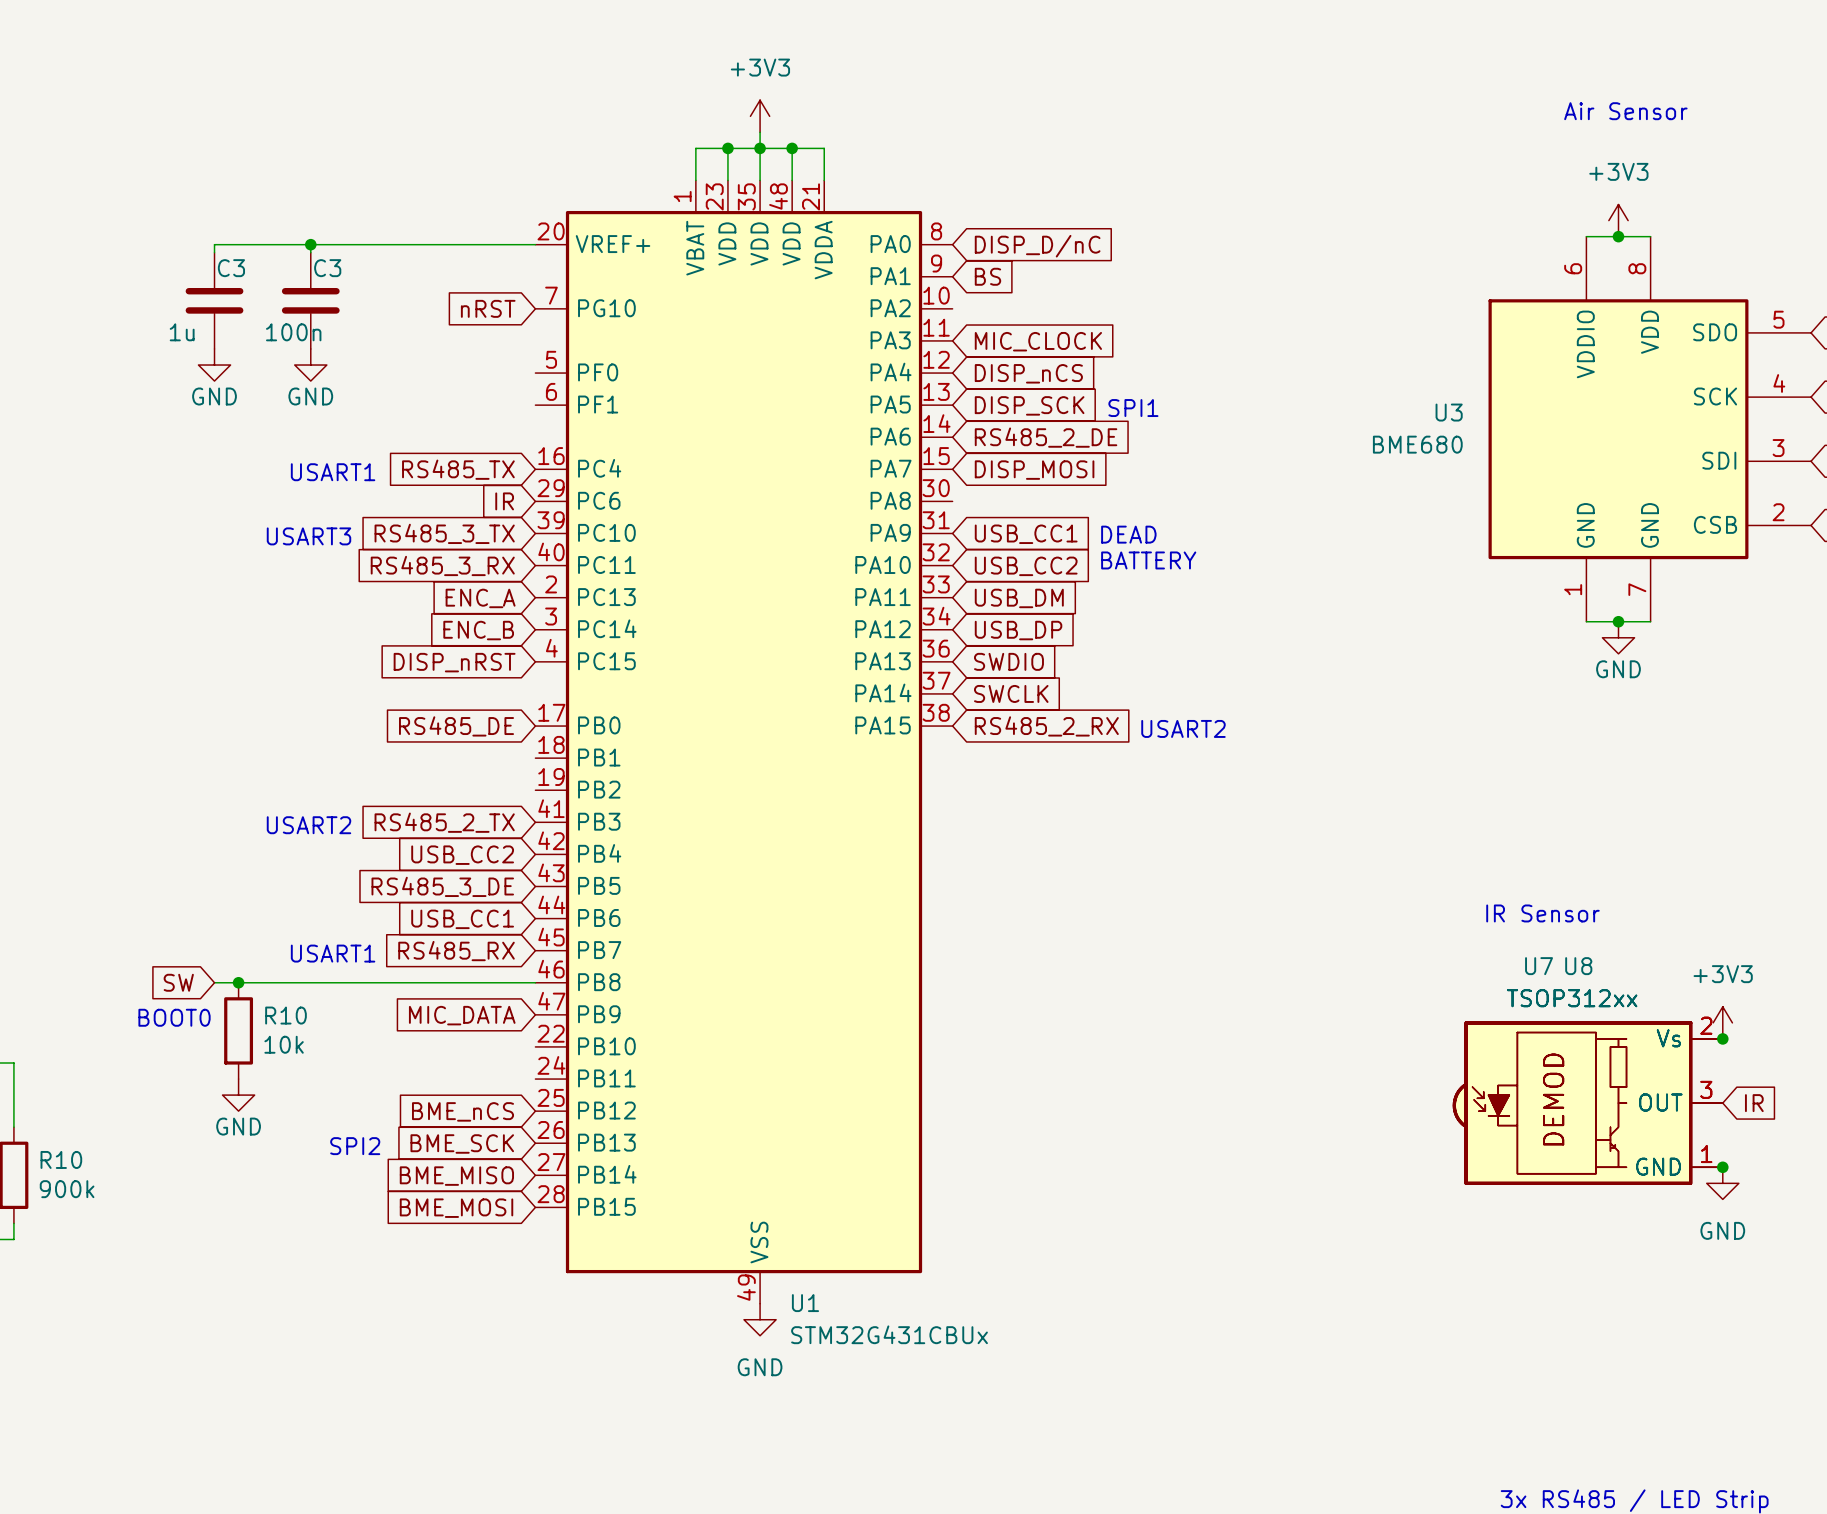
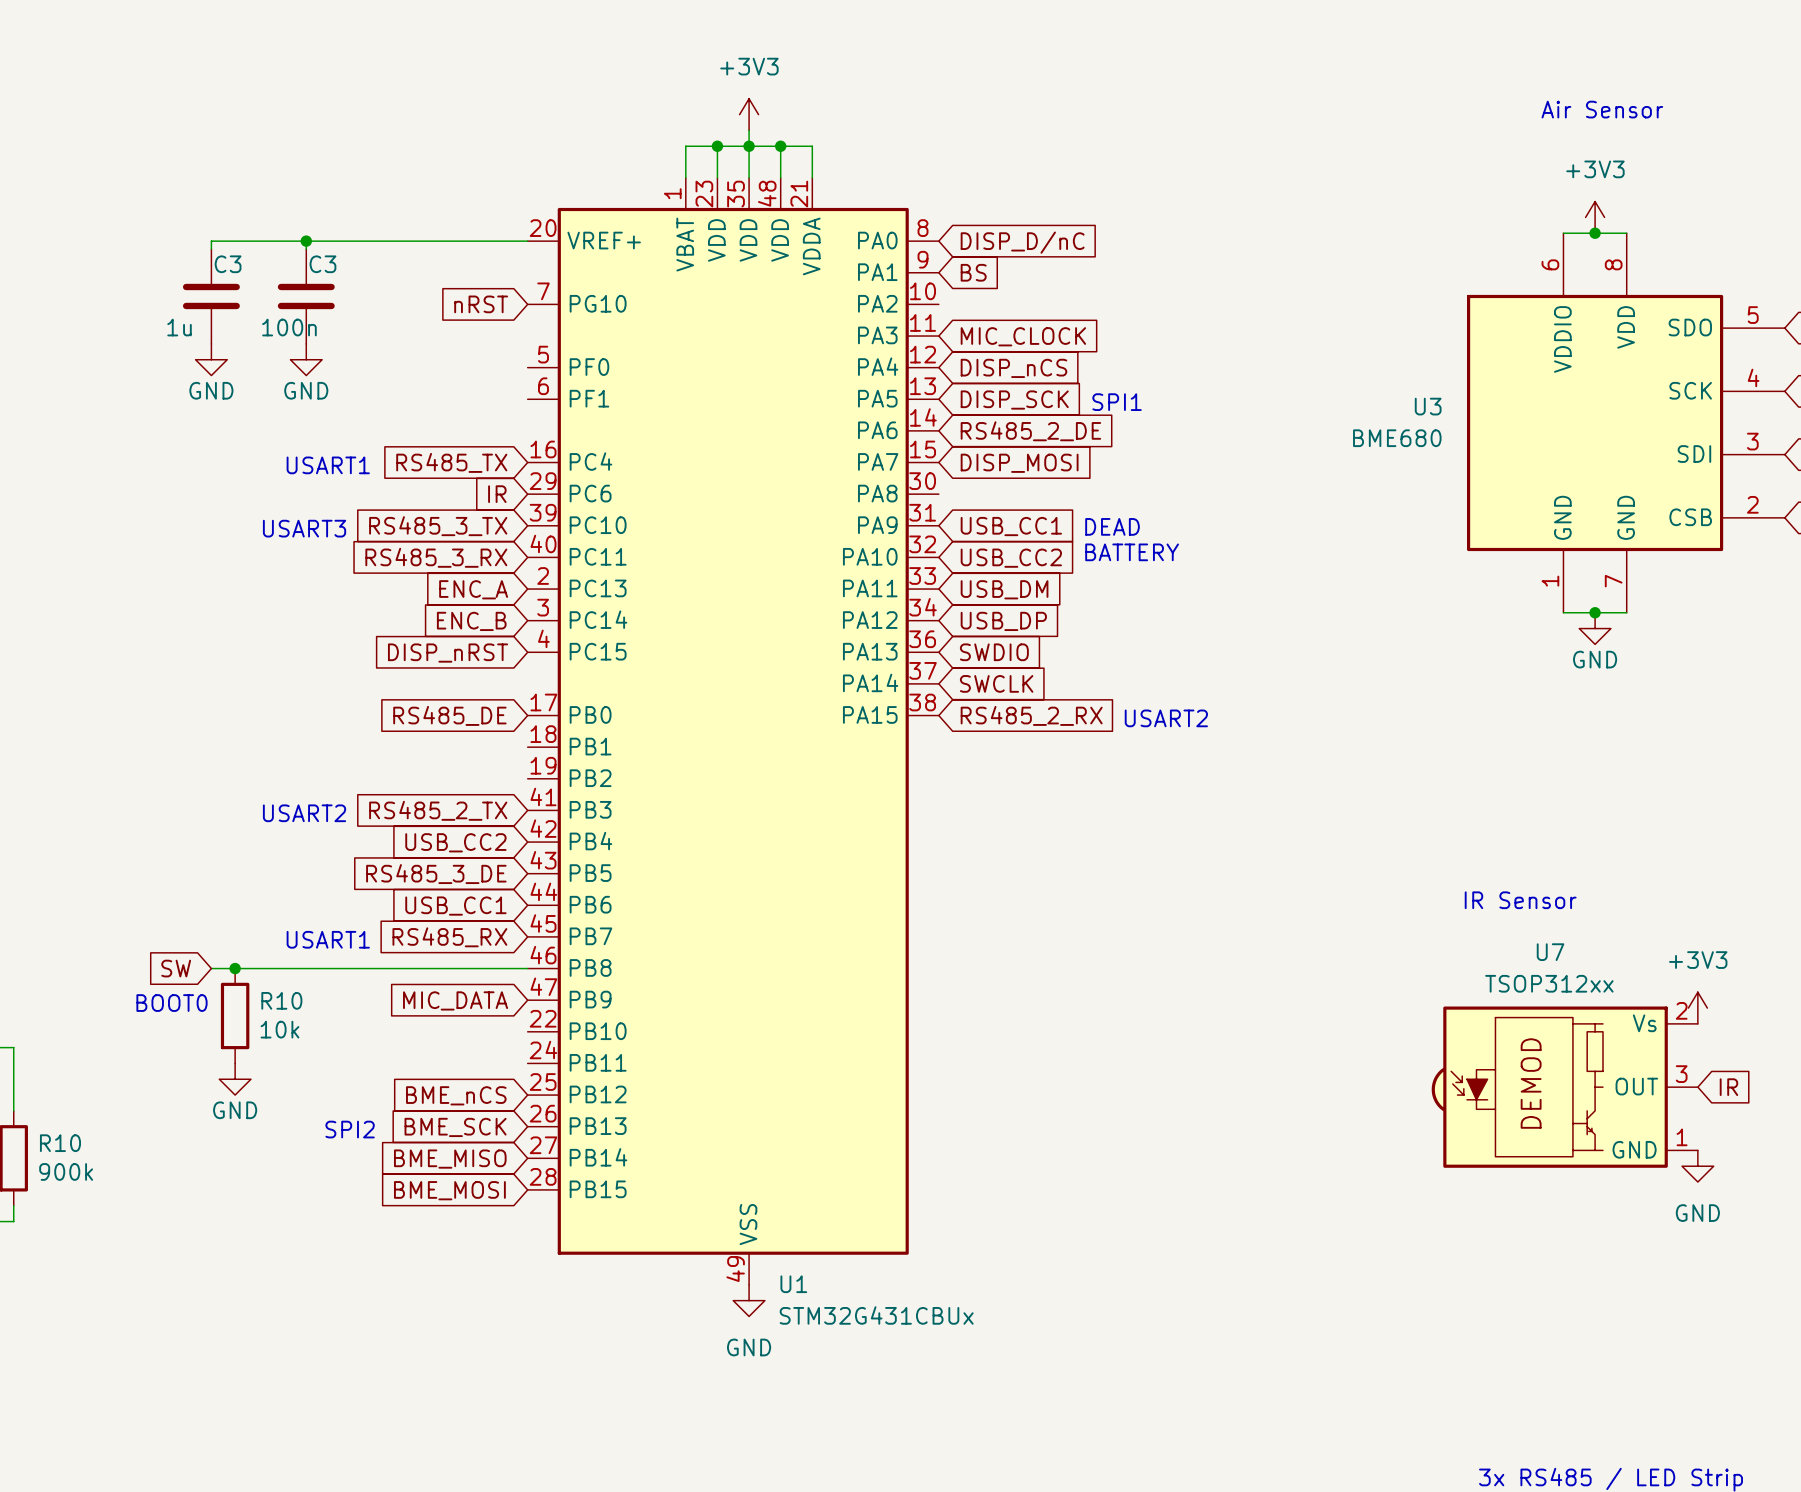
U7 name position: U7 (1539, 966) -> U7 (1550, 952)
junction: (1722, 1038) -> none
U8: TSOP312xx (1587, 1103) -> none
junction: (1722, 1167) -> none

